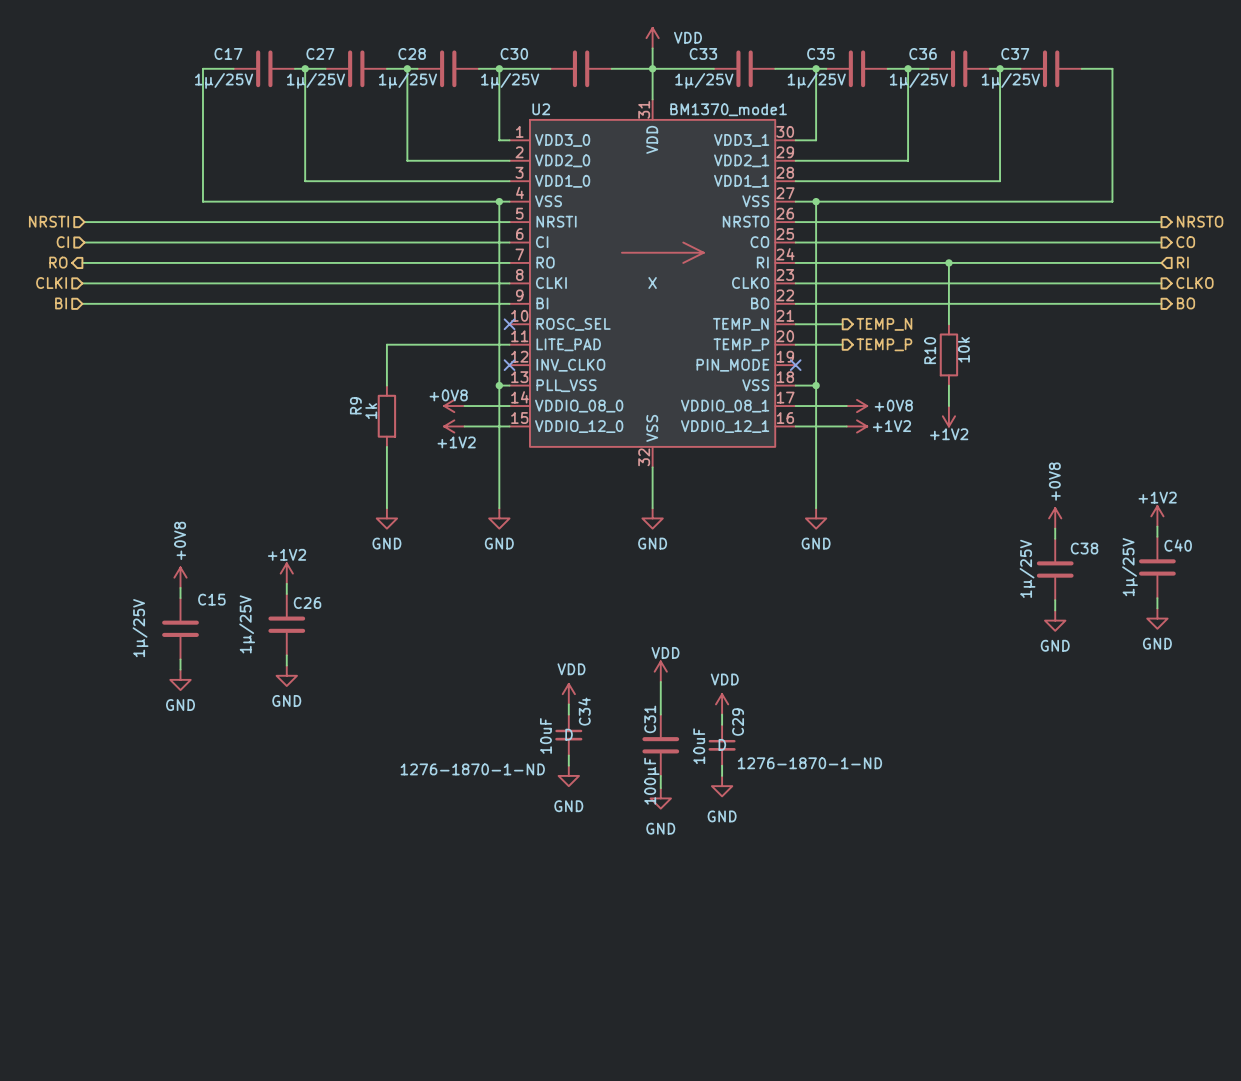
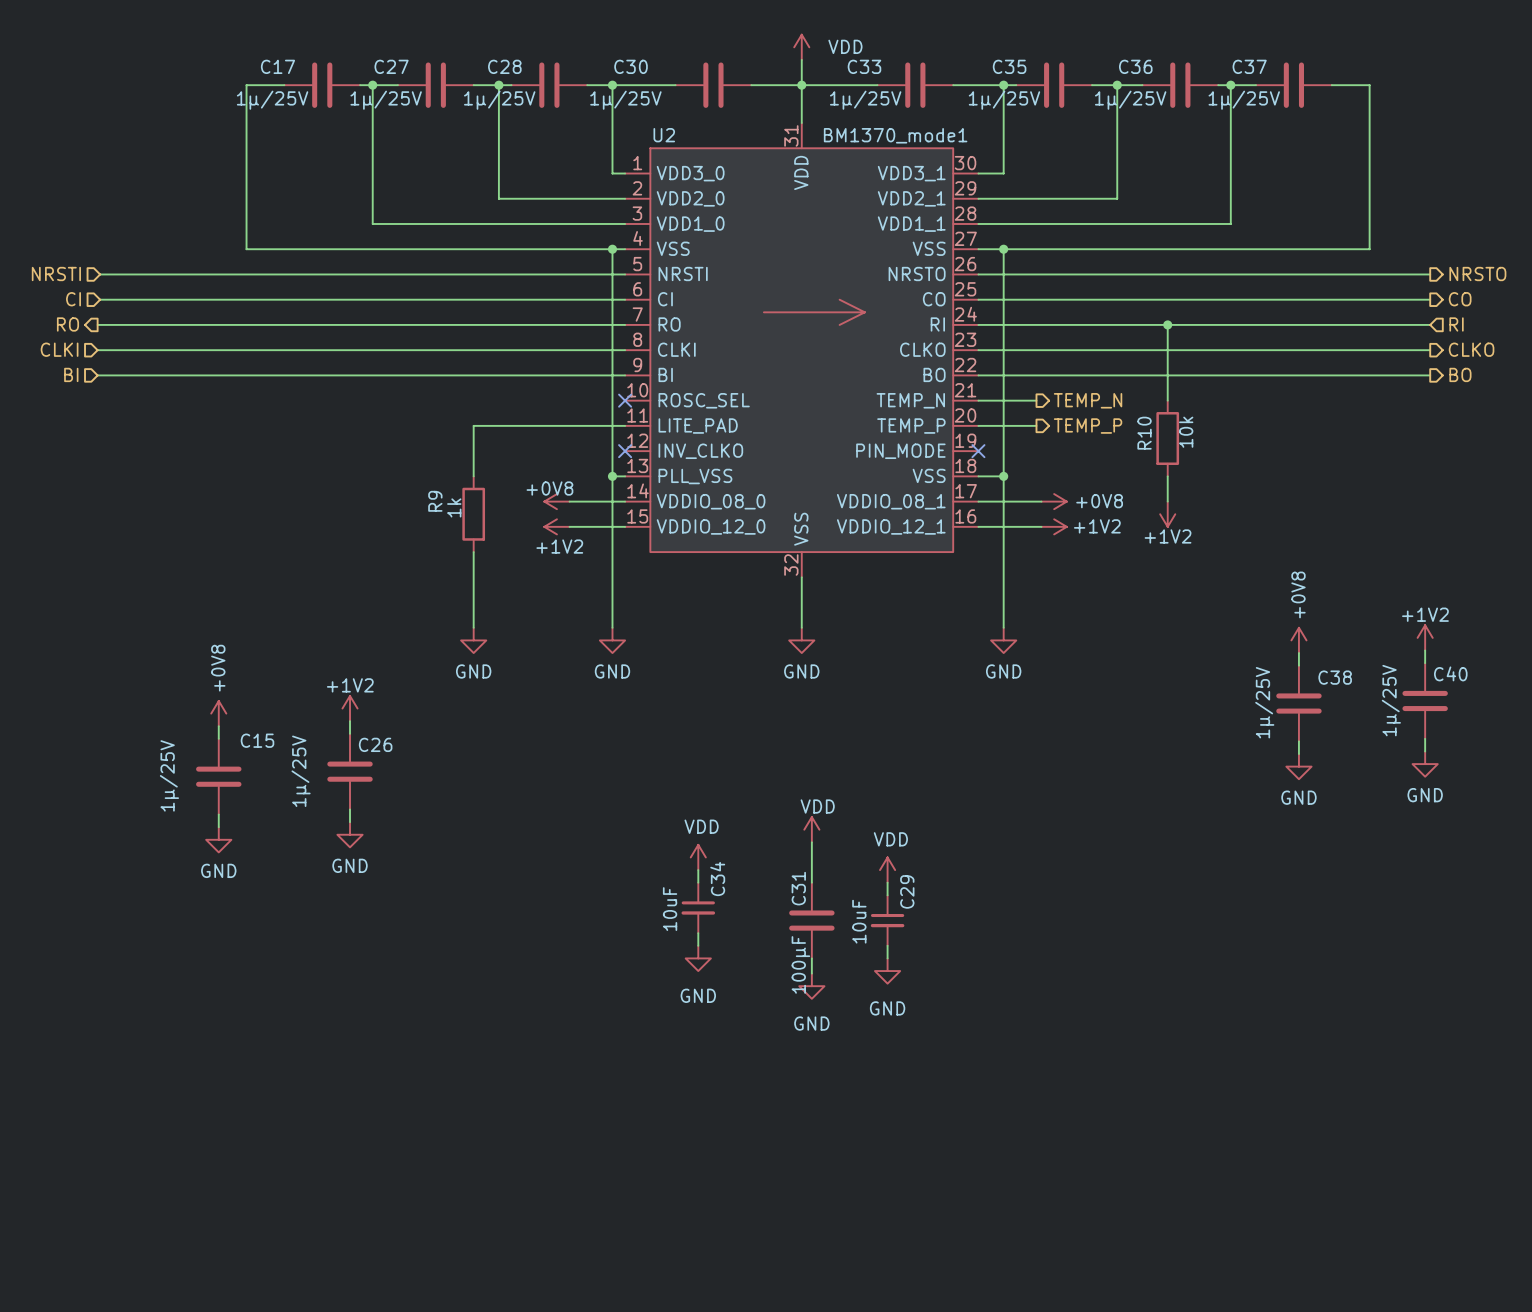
U2 text: X (652, 283) -> none
C34 text: D (569, 734) -> none
C29 text: D (722, 744) -> none
C29 text: 1276-1870-1-ND (809, 763) -> none
C34 text: 1276-1870-1-ND (472, 769) -> none

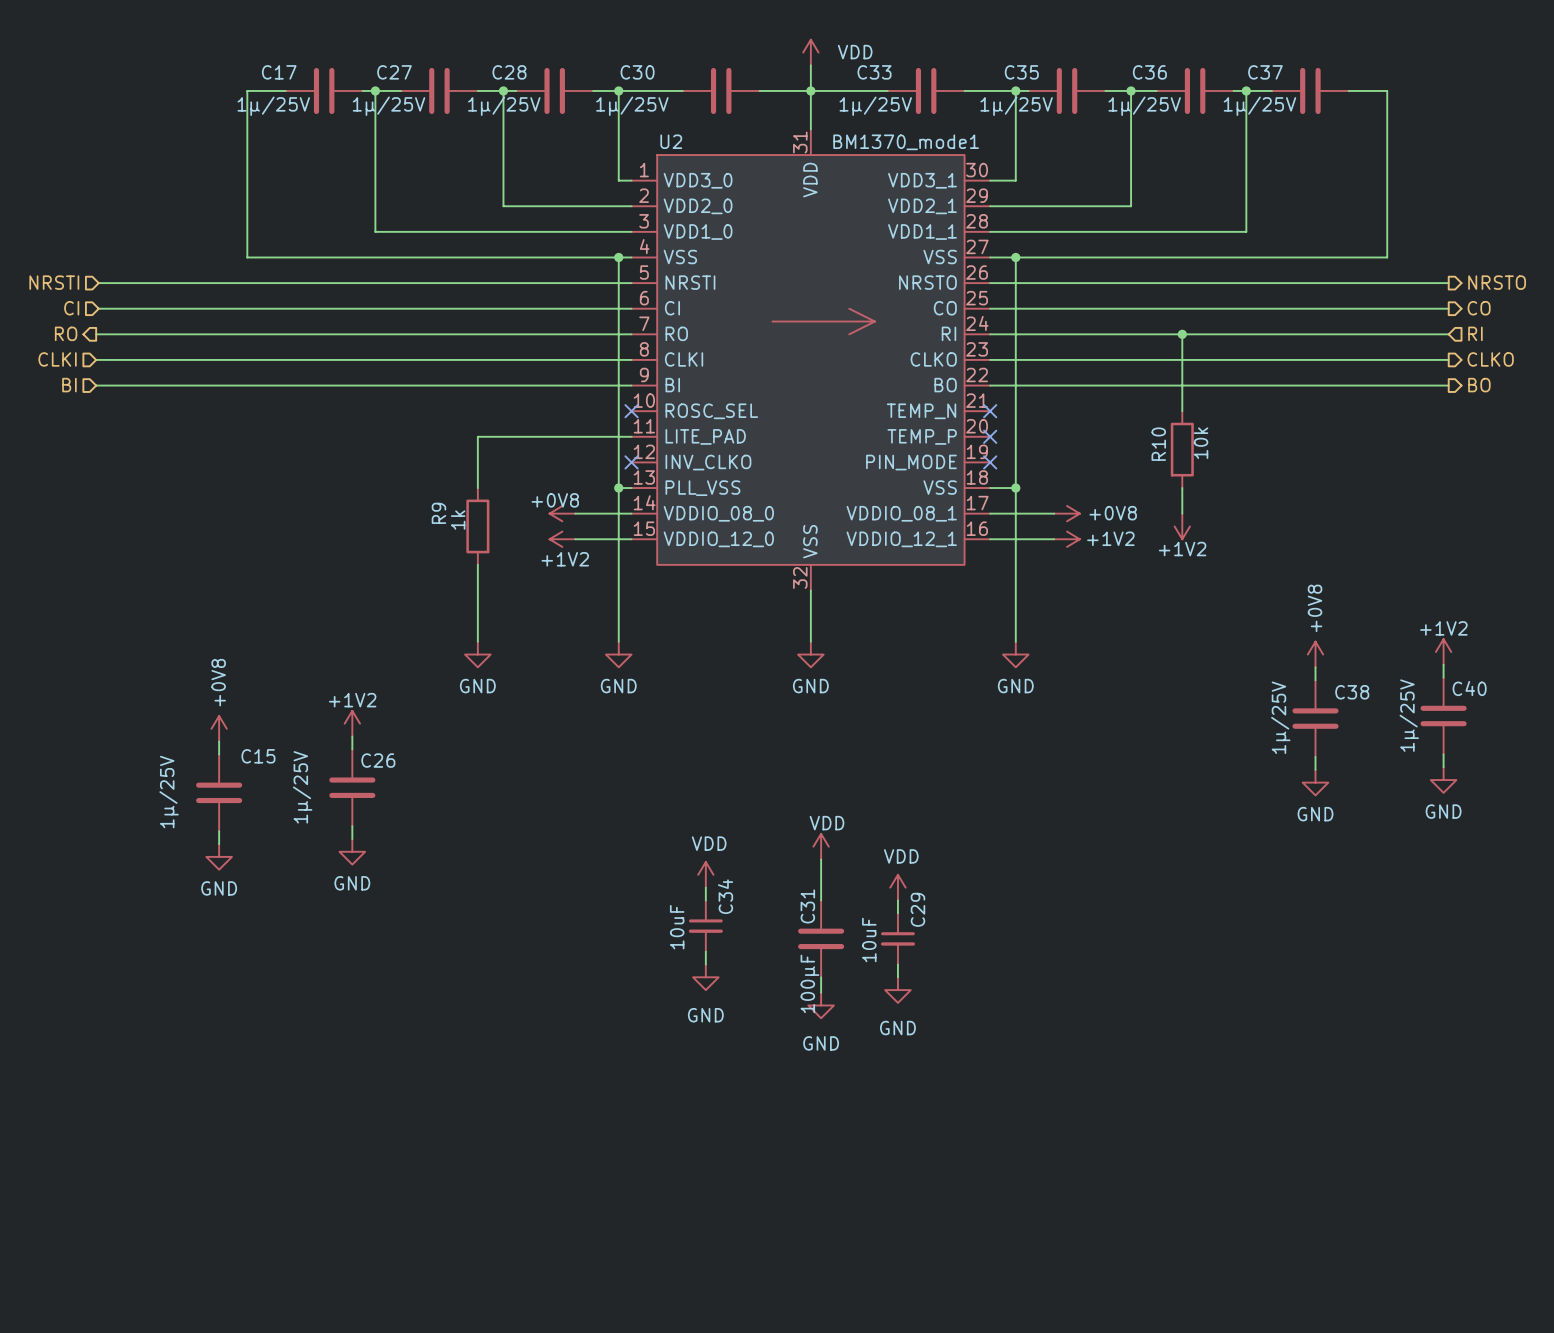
wire: (978, 400) (1036, 400) -> none
no-connect mark: none -> (990, 411)
hierarchical label: TEMP_N (1088, 400) -> none
wire: (978, 425) (1036, 425) -> none
no-connect mark: none -> (990, 436)
hierarchical label: TEMP_P (1088, 426) -> none

